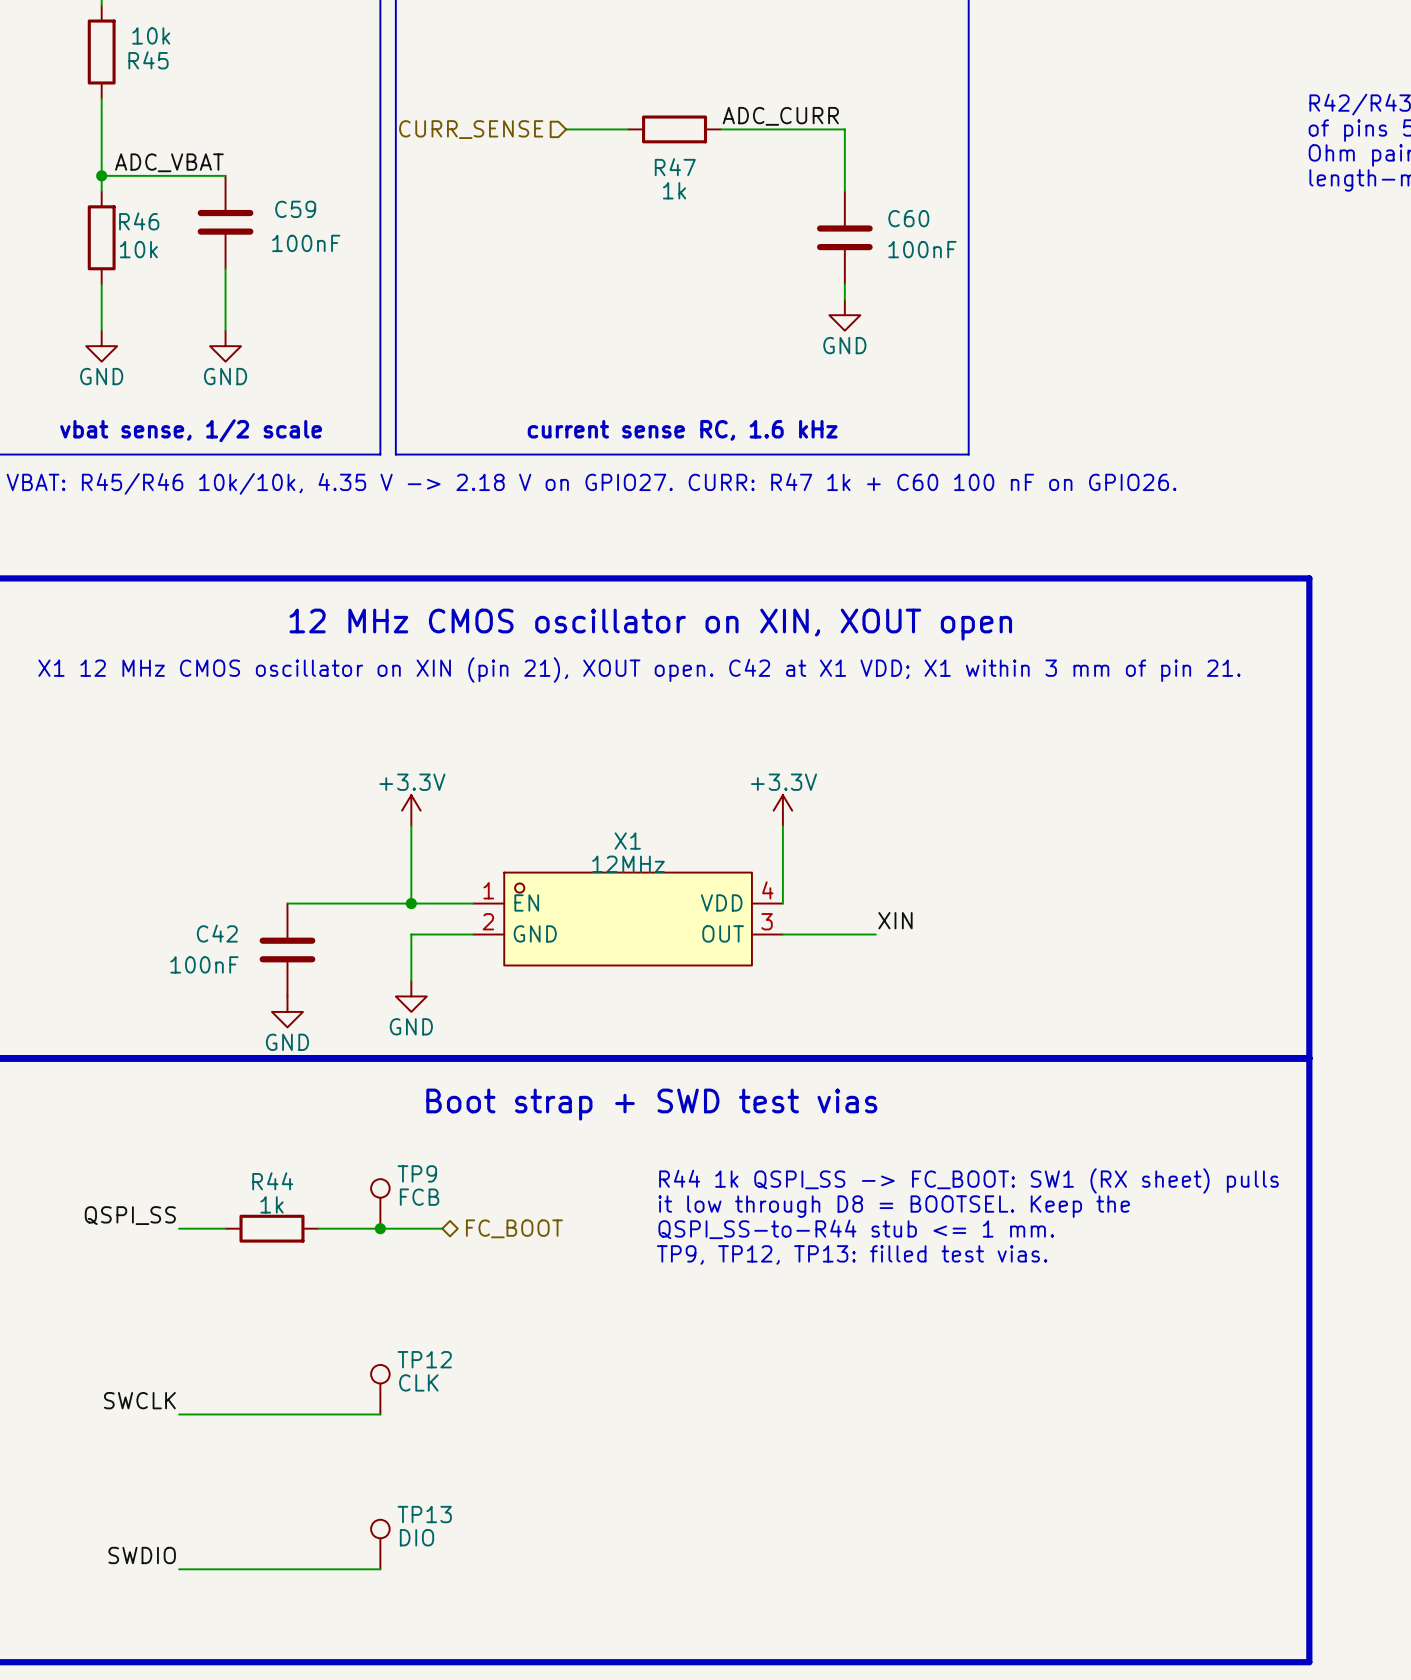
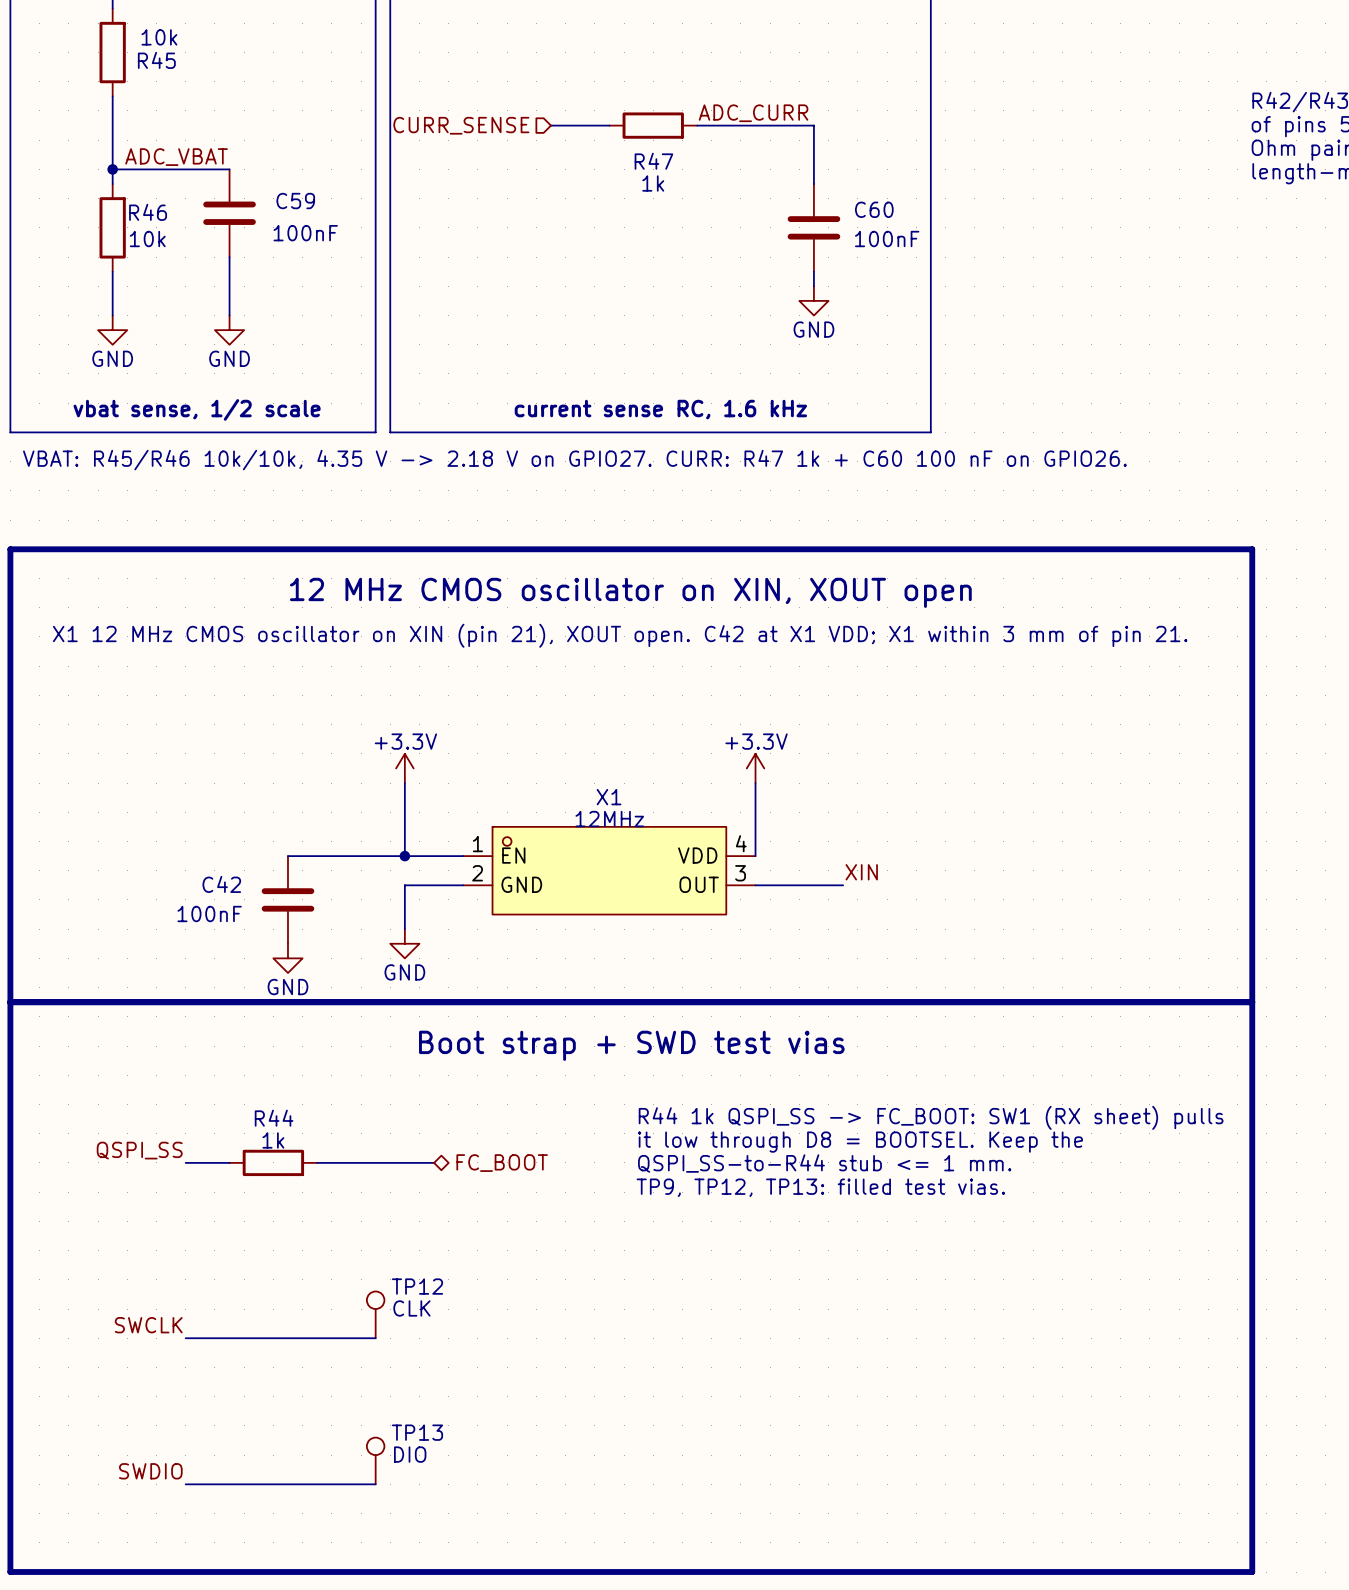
TP9: FCB (380, 1203) -> none
junction: (380, 1228) -> none

